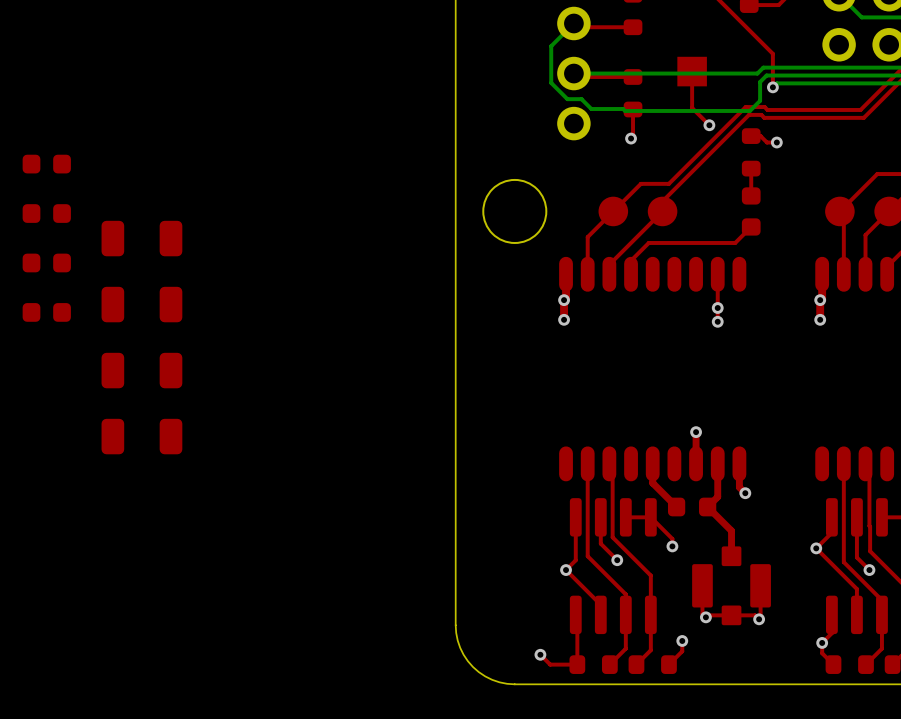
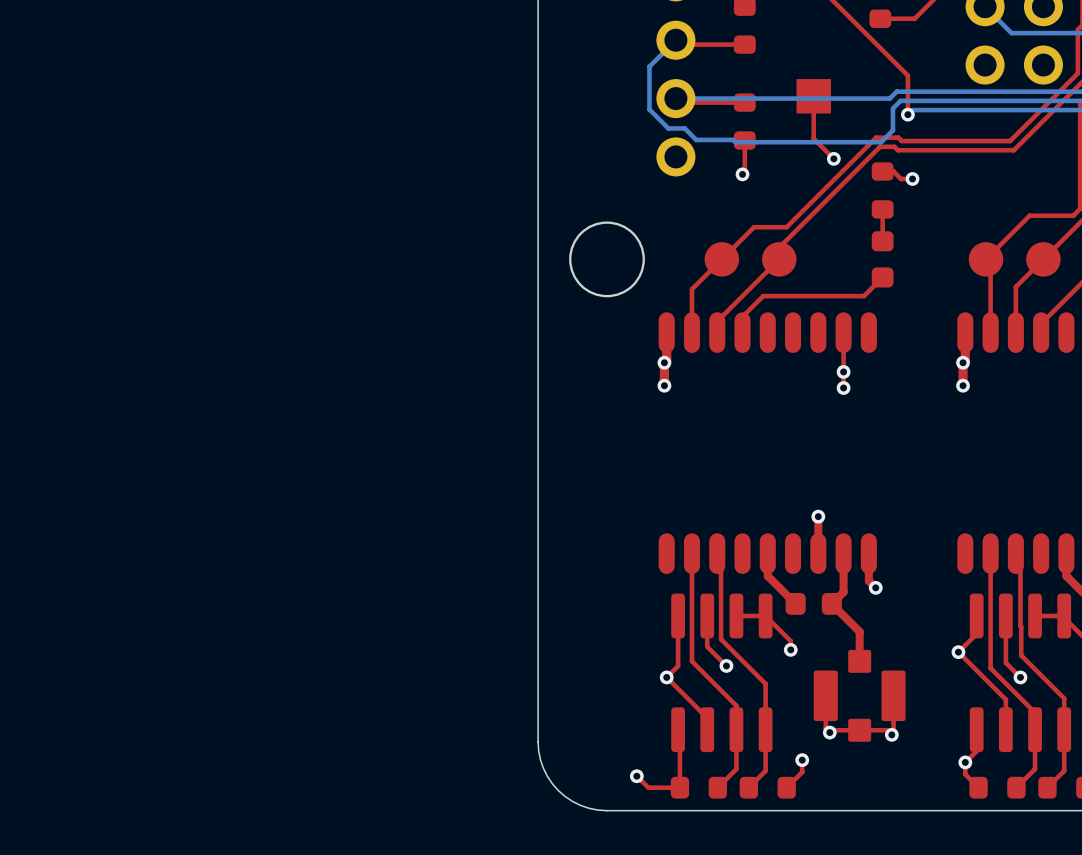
part: (46, 164) -> none
part: (46, 213) -> none
part: (141, 238) -> none
part: (46, 262) -> none
part: (141, 304) -> none
part: (46, 312) -> none
part: (141, 370) -> none
part: (141, 436) -> none

